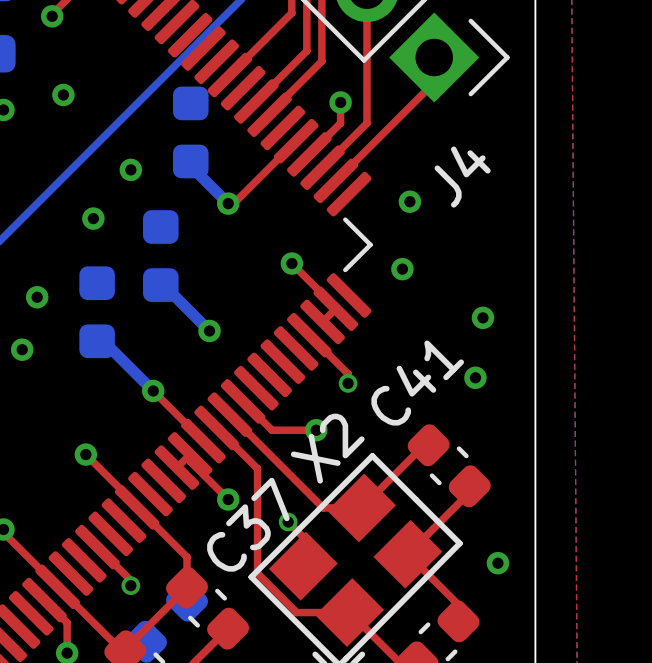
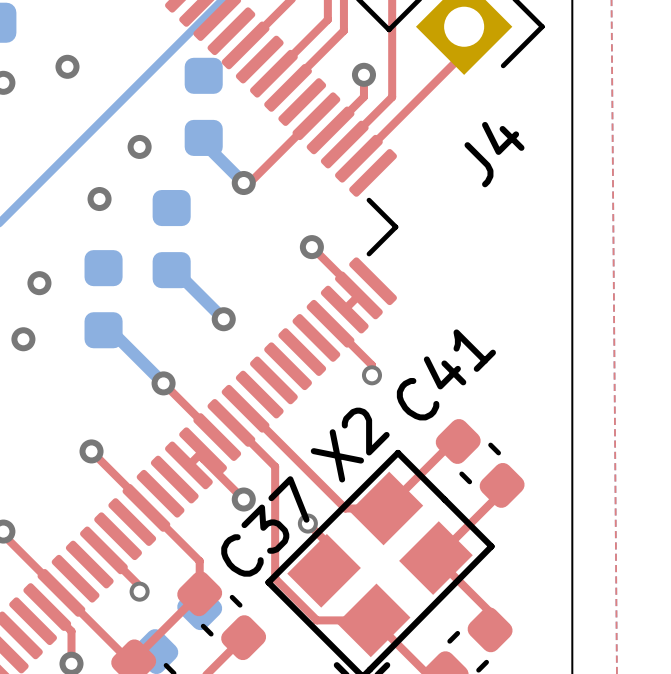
via: (409, 201) -> none
via: (402, 269) -> none
via: (482, 317) -> none
via: (475, 377) -> none
top track: (243, 401) (271, 430) (316, 430) -> none
via: (316, 430) -> none
via: (497, 563) -> none

